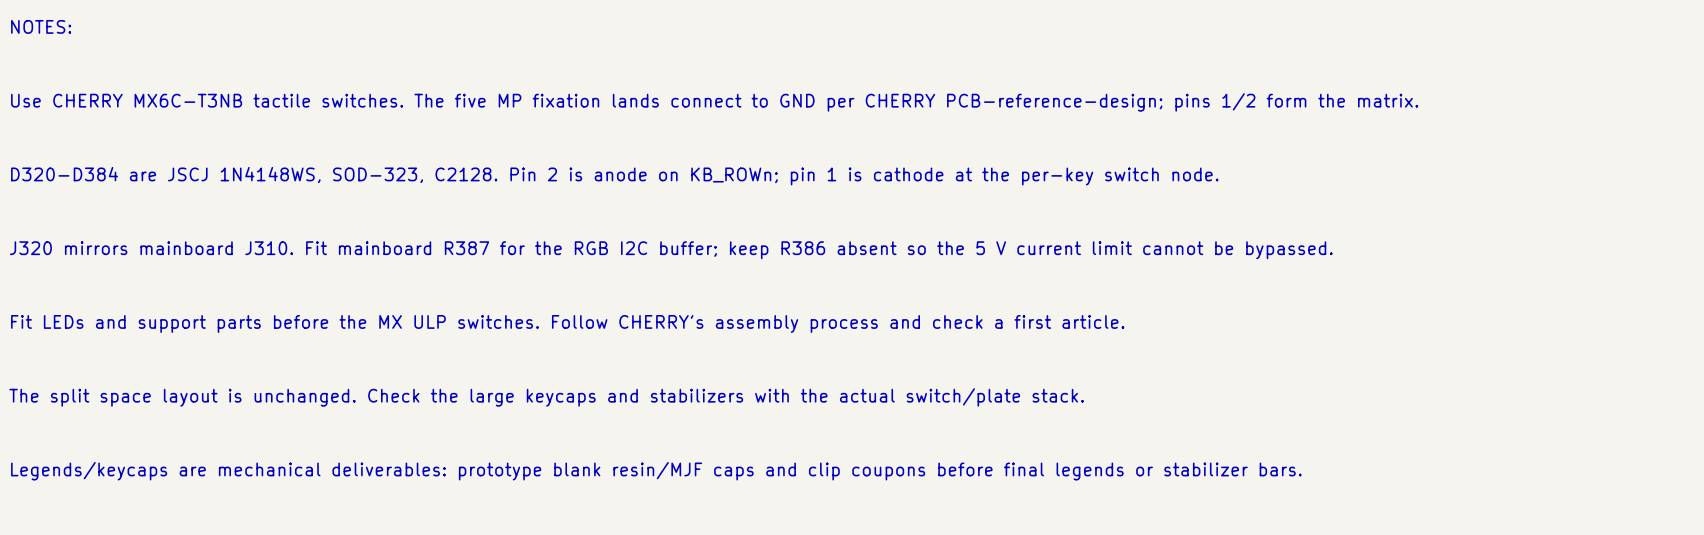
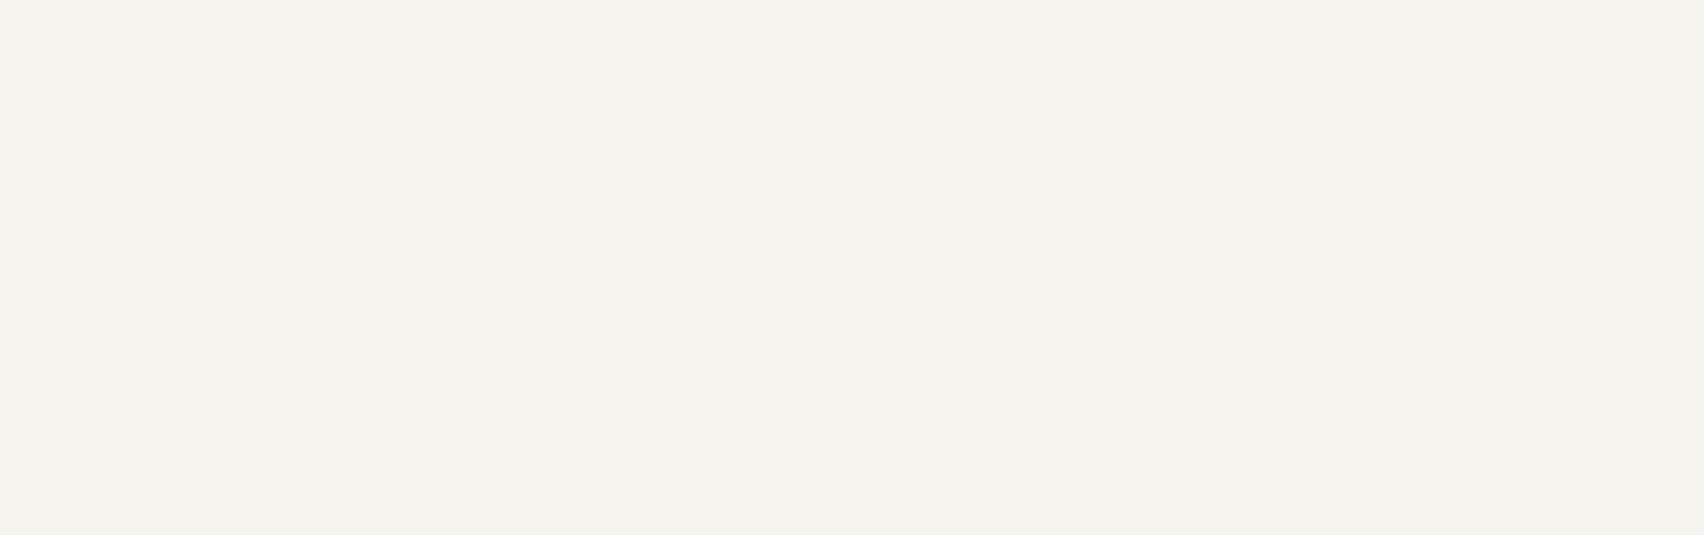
text: NOTES: (41, 26) -> none
text: Use CHERRY MX6C-T3NB tactile switches. The five MP fixation lands connect to GND per CHERRY PCB-reference-design; pins 1/2 form the matrix. (714, 102) -> none
text: D320-D384 are JSCJ 1N4148WS, SOD-323, C2128. Pin 2 is anode on KB_ROWn; pin 1 is cathode at the per-key switch node. (614, 176) -> none
text: J320 mirrors mainboard J310. Fit mainboard R387 for the RGB I2C buffer; keep R386 absent so the 5 V current limit cannot be bypassed. (671, 250) -> none
text: Fit LEDs and support parts before the MX ULP switches. Follow CHERRY's assembly process and check a first article. (567, 323) -> none
text: The split space layout is unchanged. Check the large keycaps and stabilizers with the actual switch/plate stack. (546, 397) -> none
text: Legends/keycaps are mechanical deliverables: prototype blank resin/MJF caps and clip coupons before final legends or stabilizer bars. (656, 471) -> none

